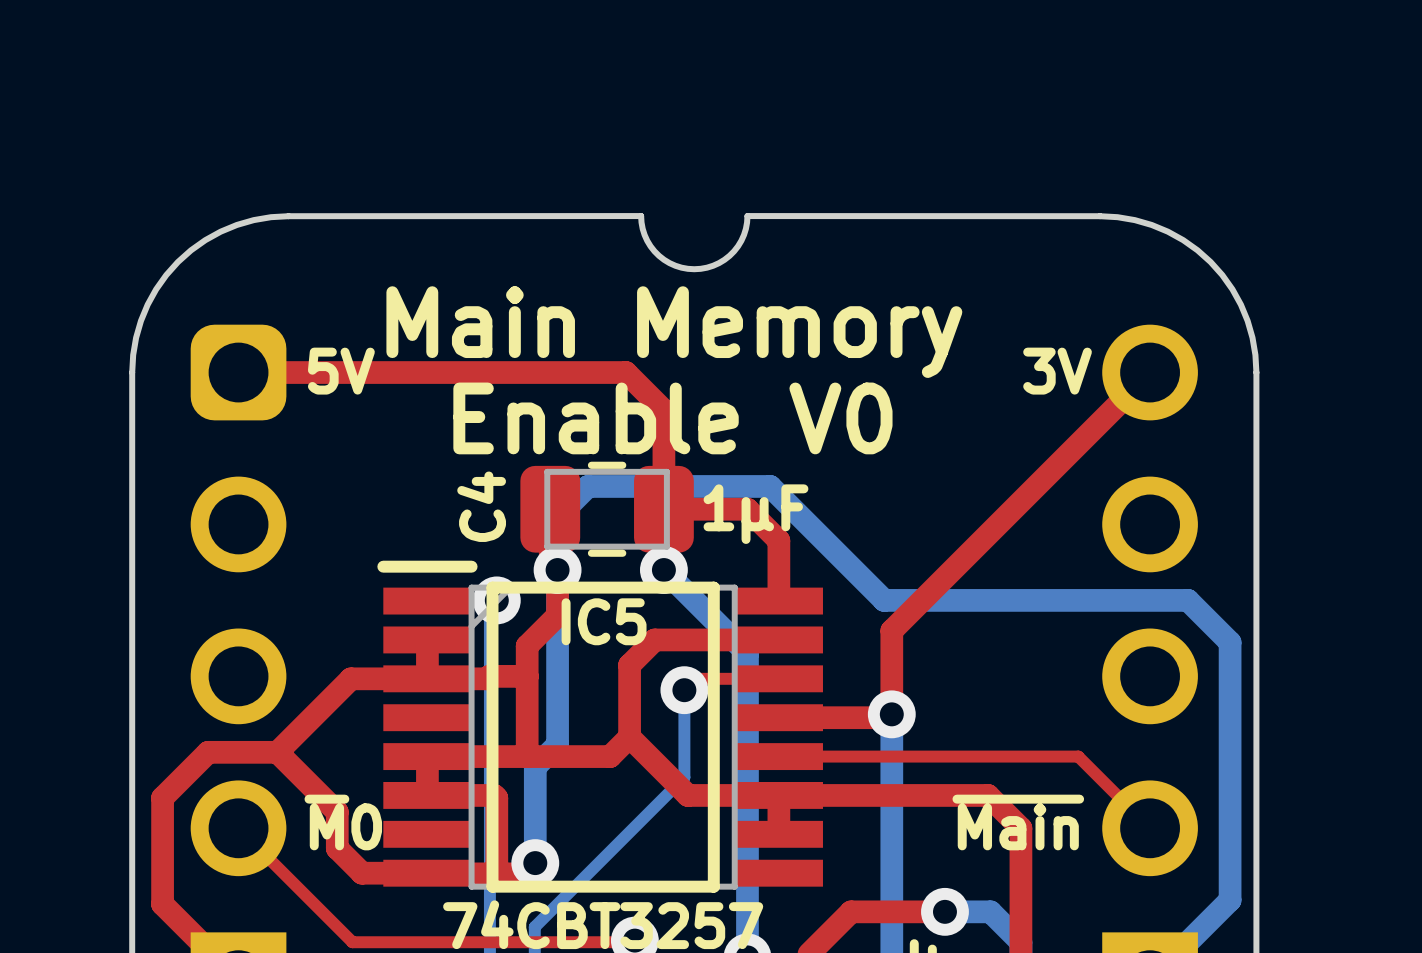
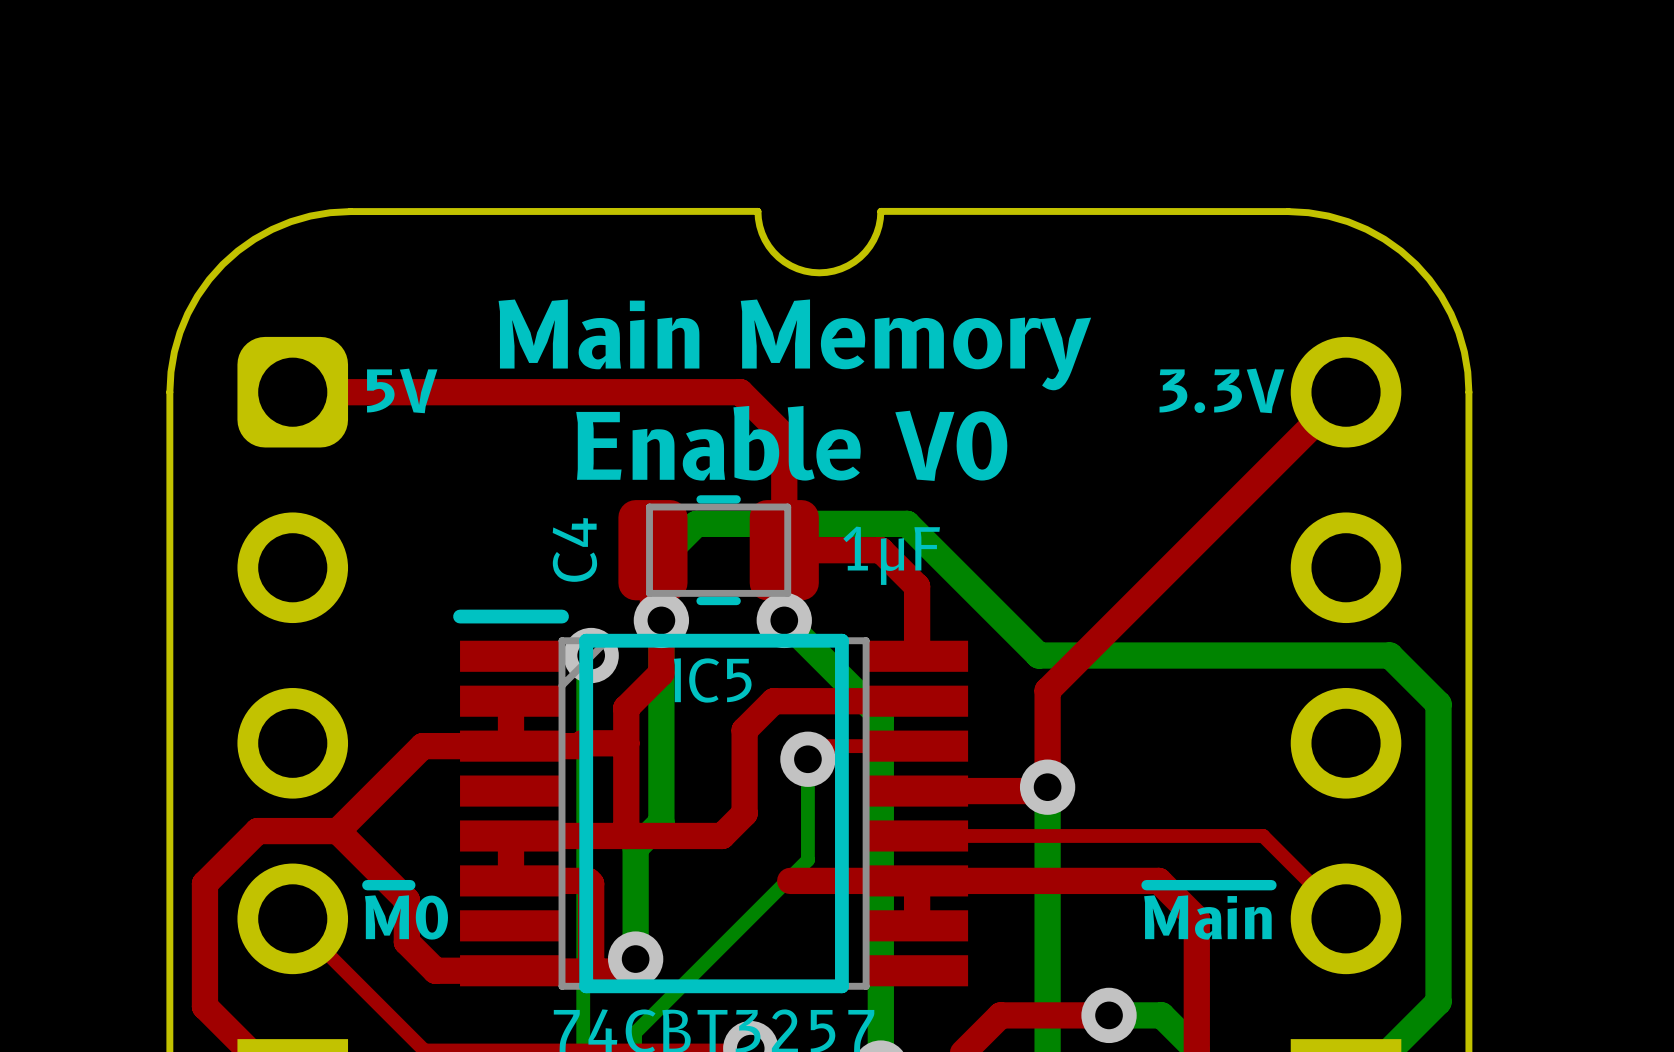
text: 3V (1057, 371) -> 3.3V (1221, 390)
top track: (629, 737) (687, 795) -> (790, 880) (811, 880)

